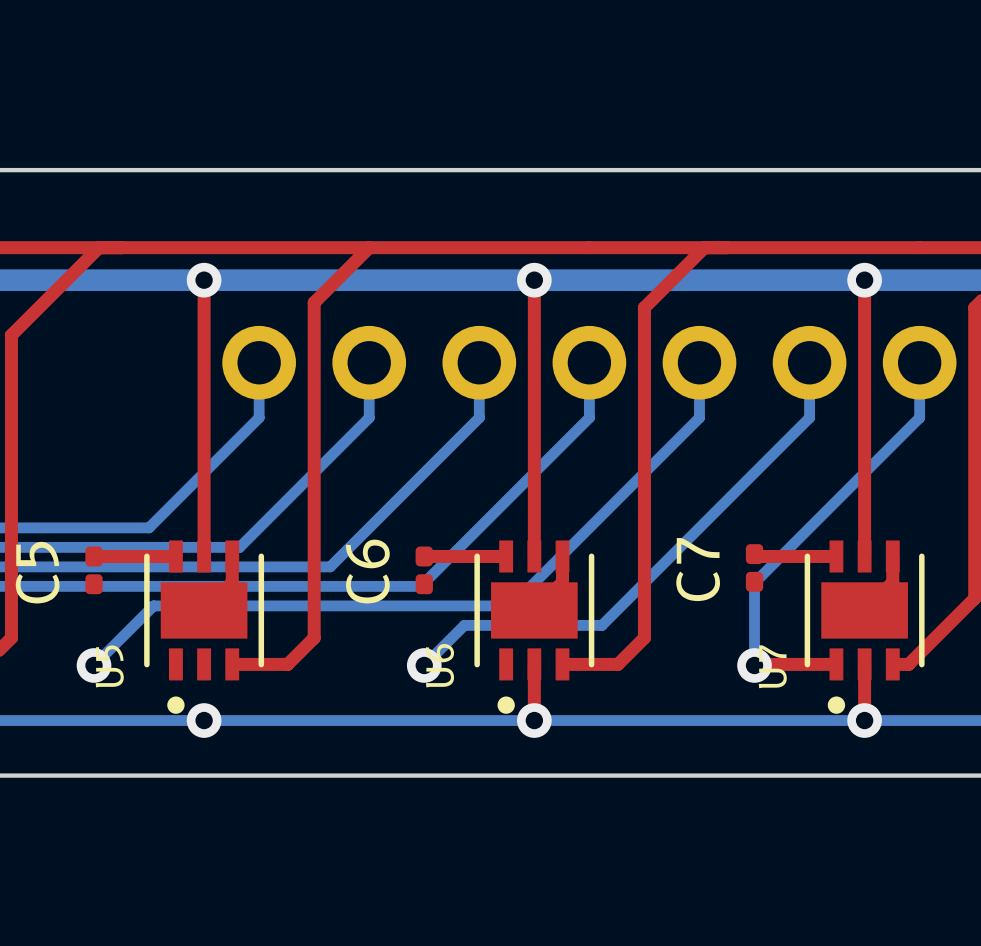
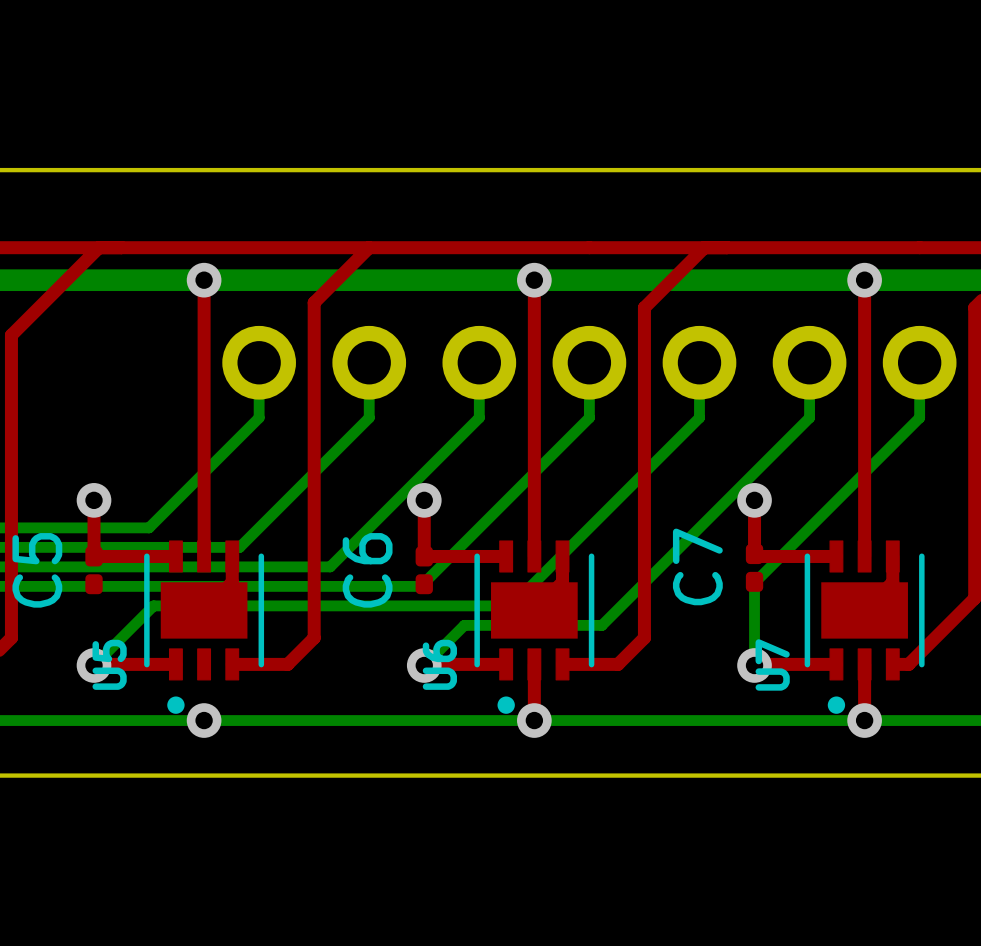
top track: none -> (94, 500) (94, 556)
via: none -> (94, 500)
top track: none -> (424, 500) (424, 556)
via: none -> (424, 500)
top track: none -> (754, 500) (754, 554)
via: none -> (754, 500)
top track: none -> (175, 664) (94, 665)
top track: none -> (506, 664) (424, 665)

